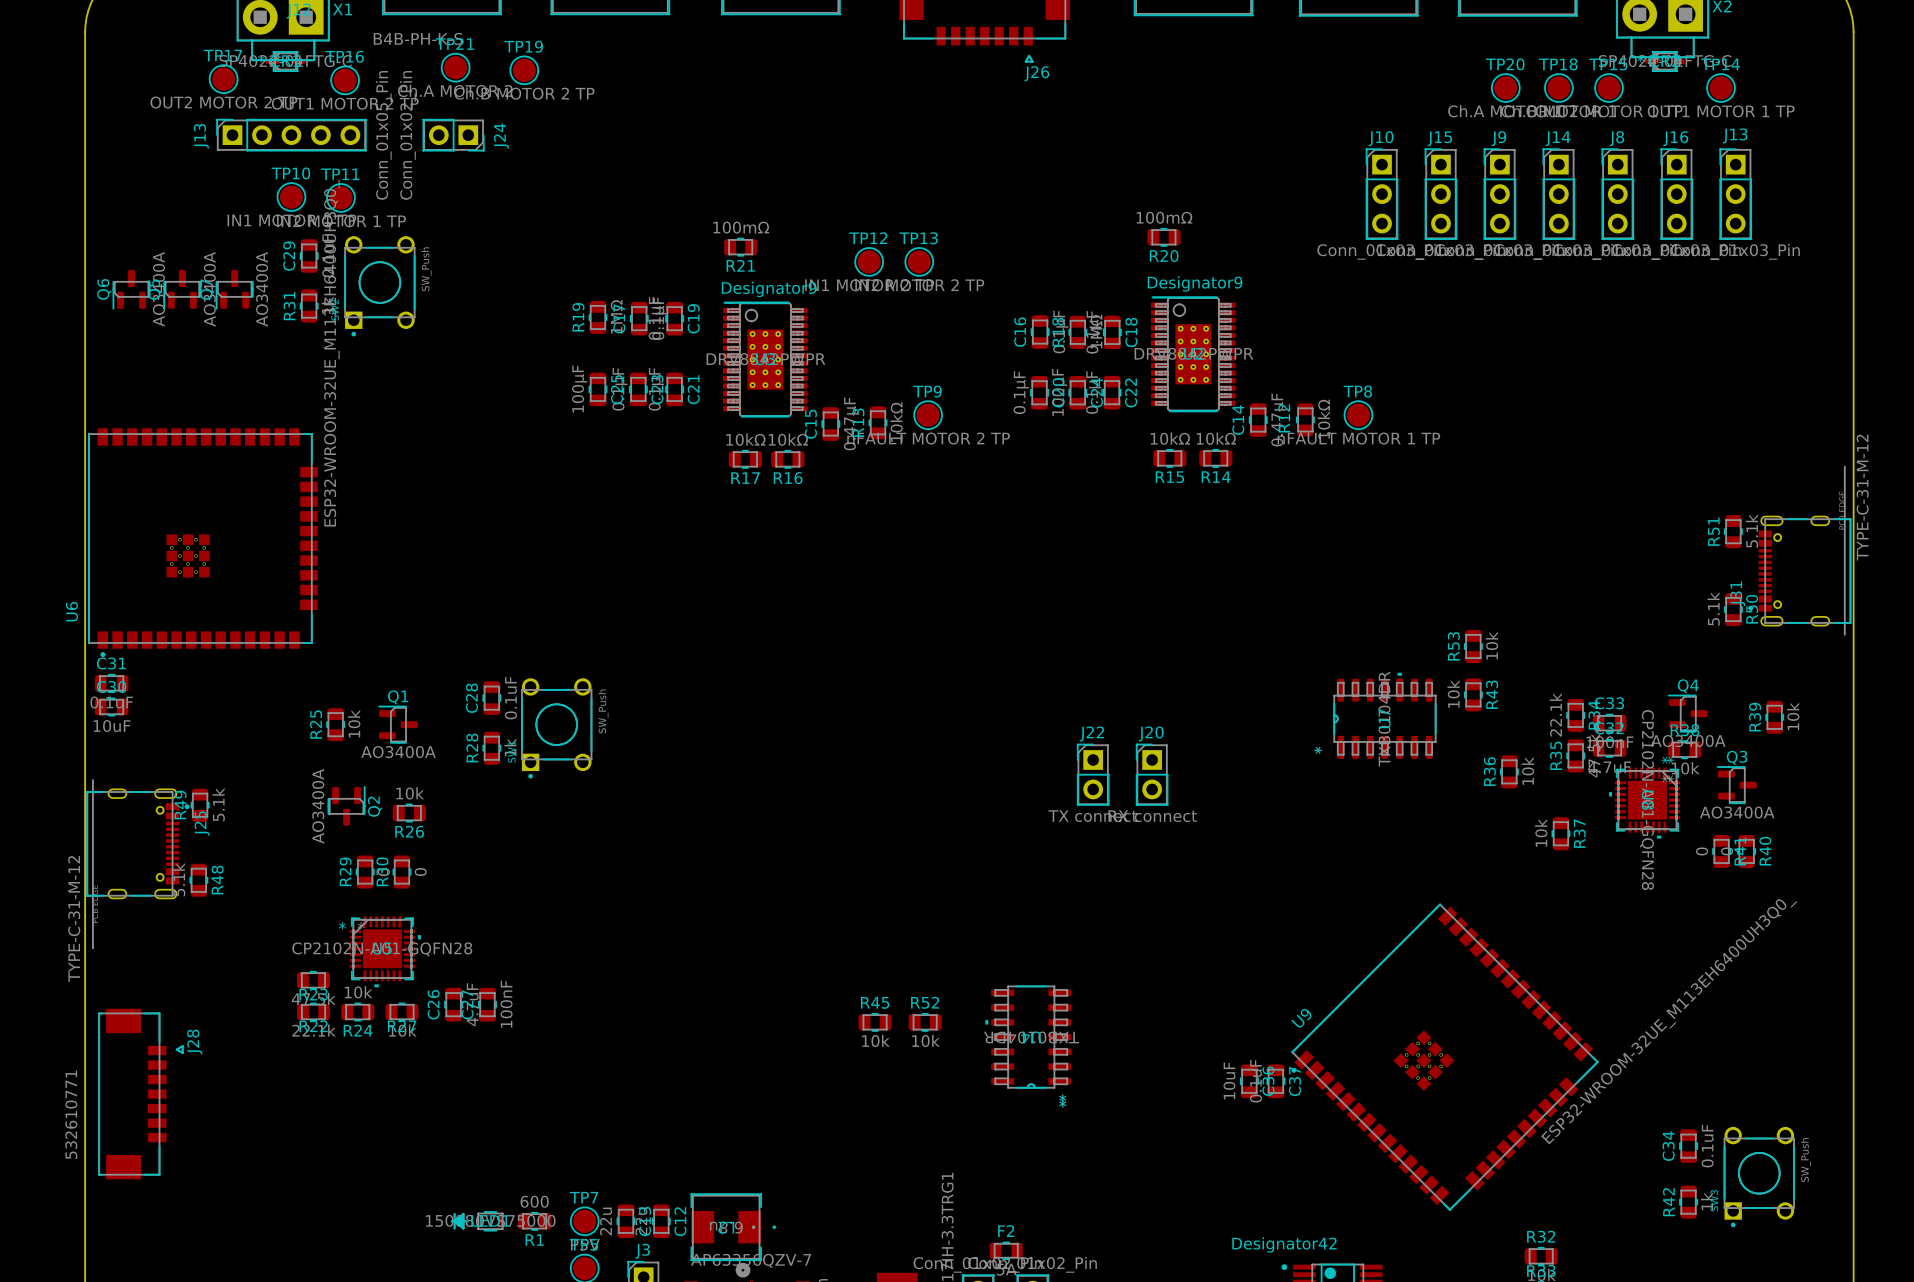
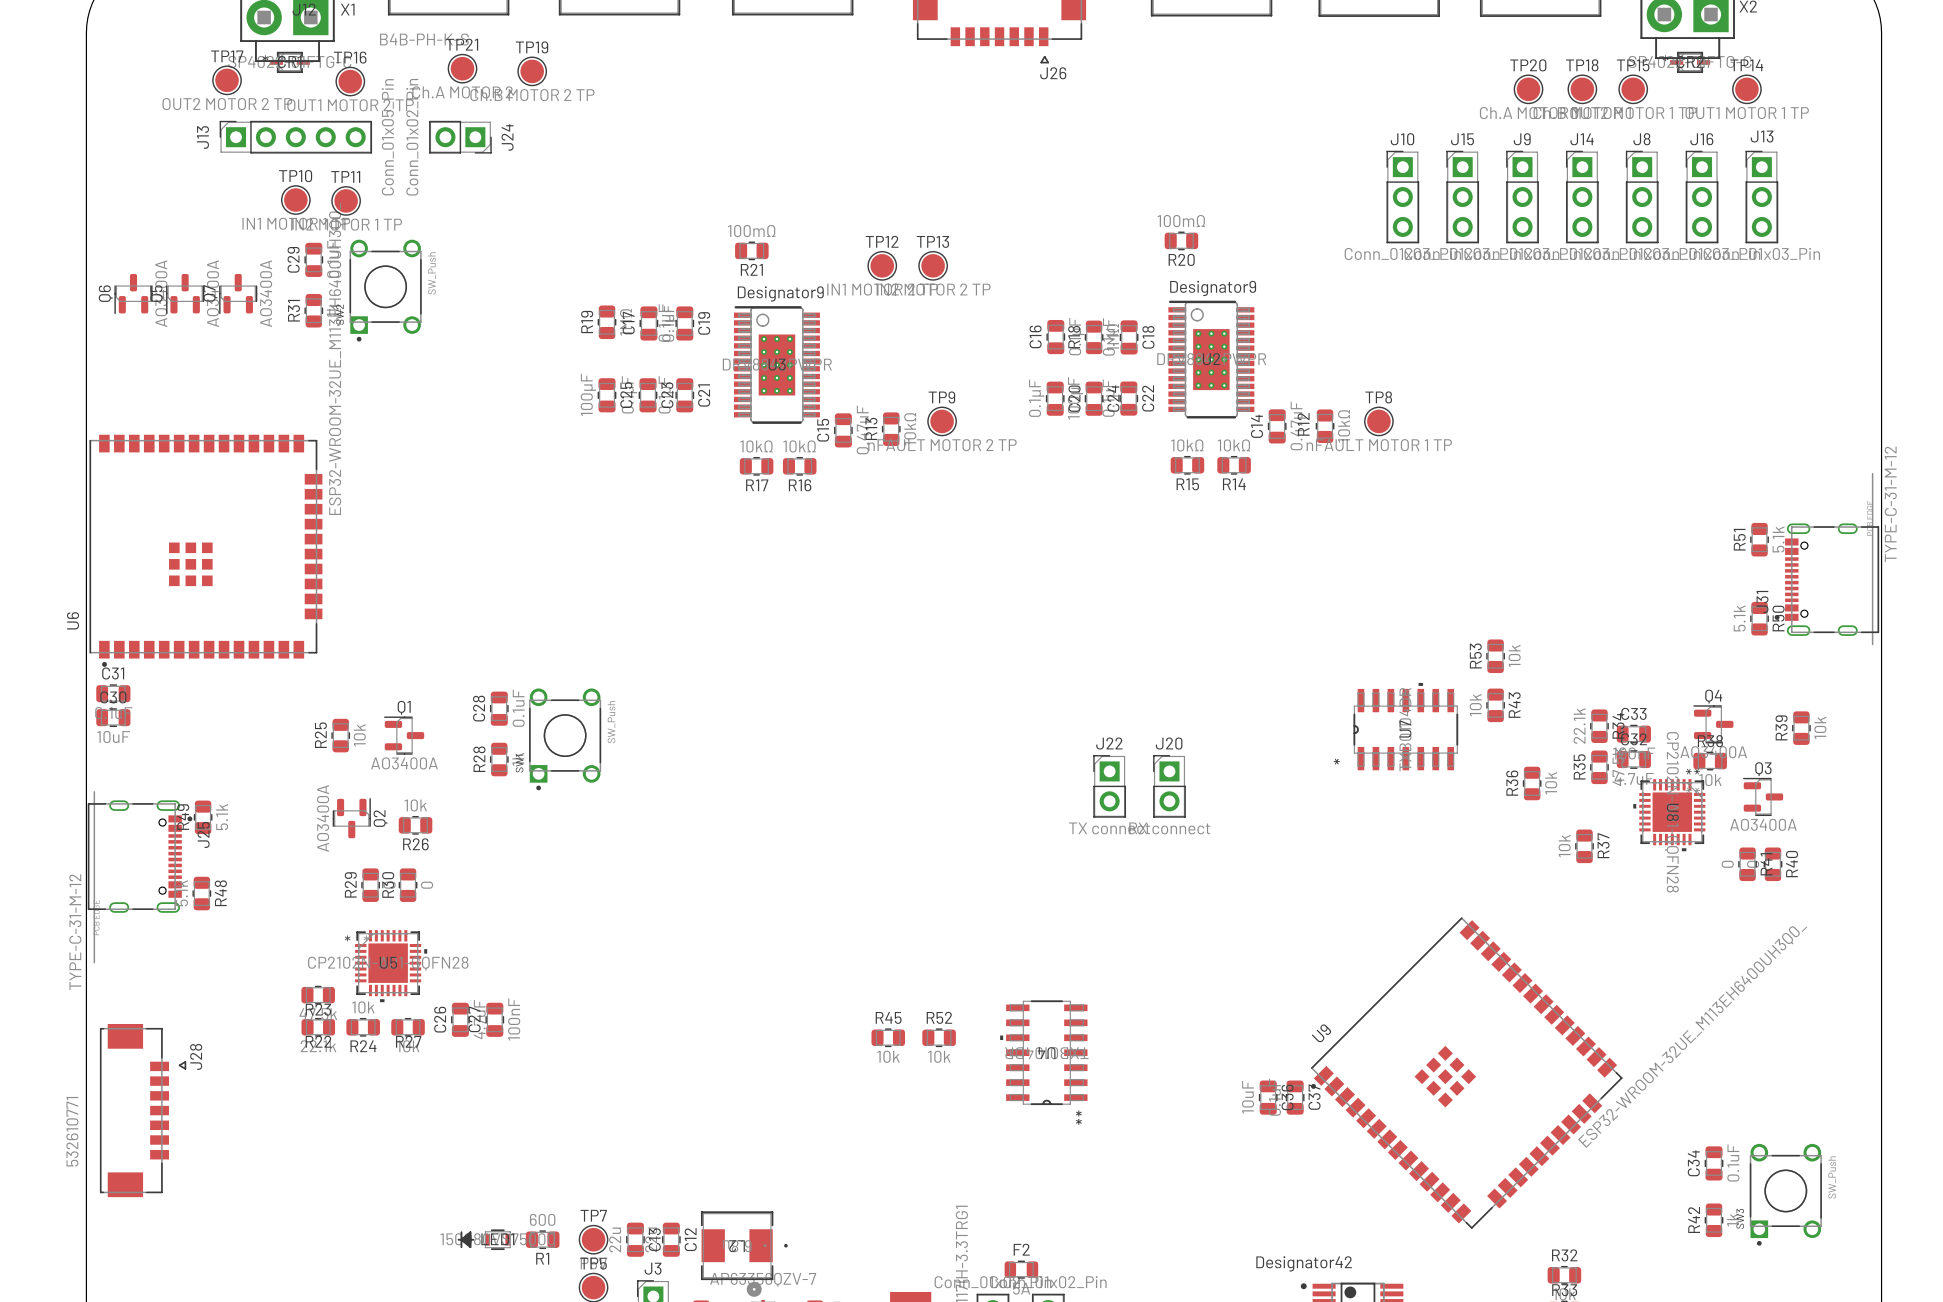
U6 footprint: [88, 428, 318, 657] -> [89, 434, 323, 667]
U9 footprint: [1291, 903, 1599, 1211] -> [1311, 917, 1623, 1229]

